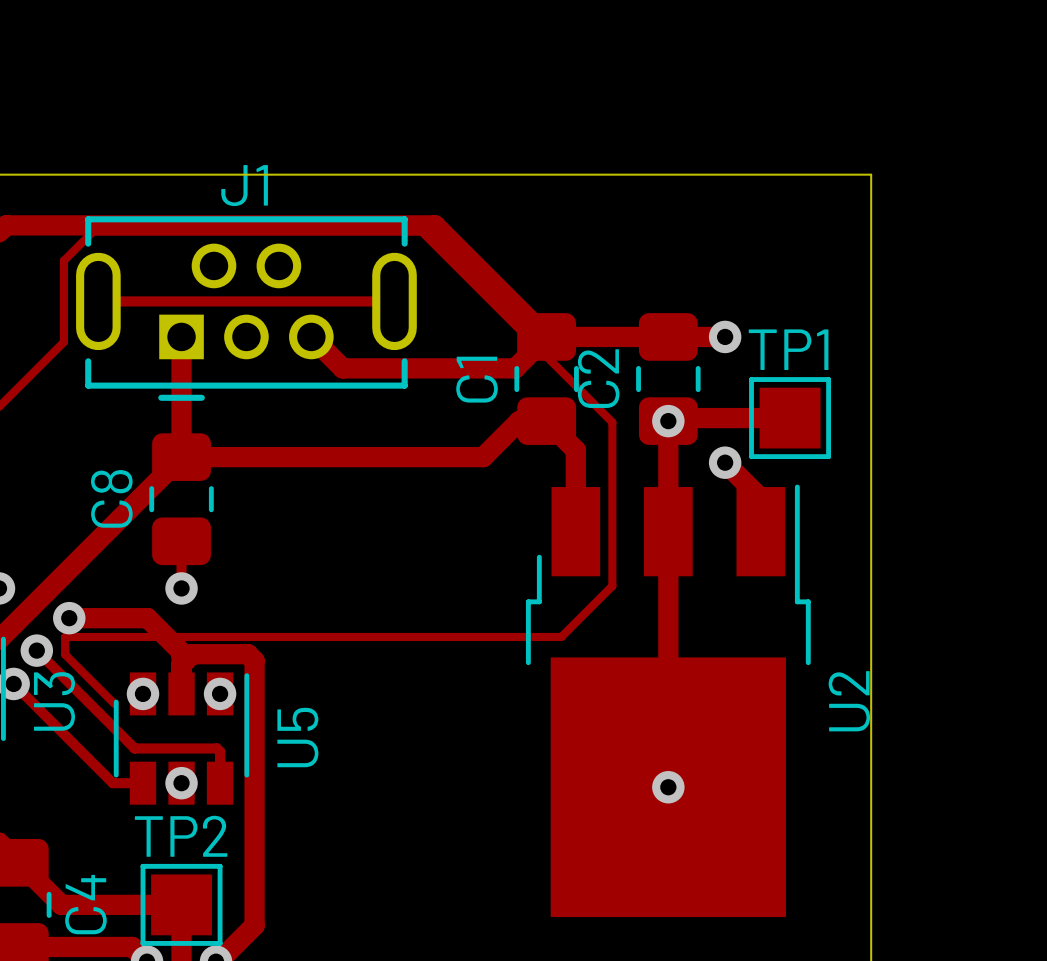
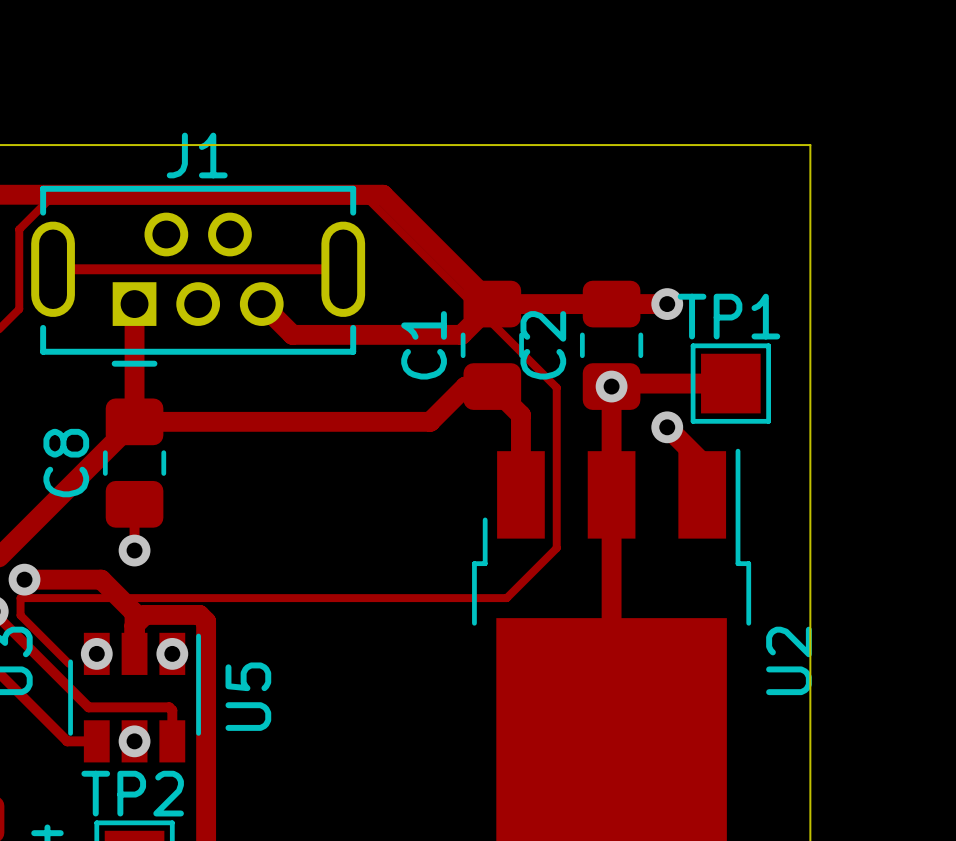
via: (668, 787) -> none

